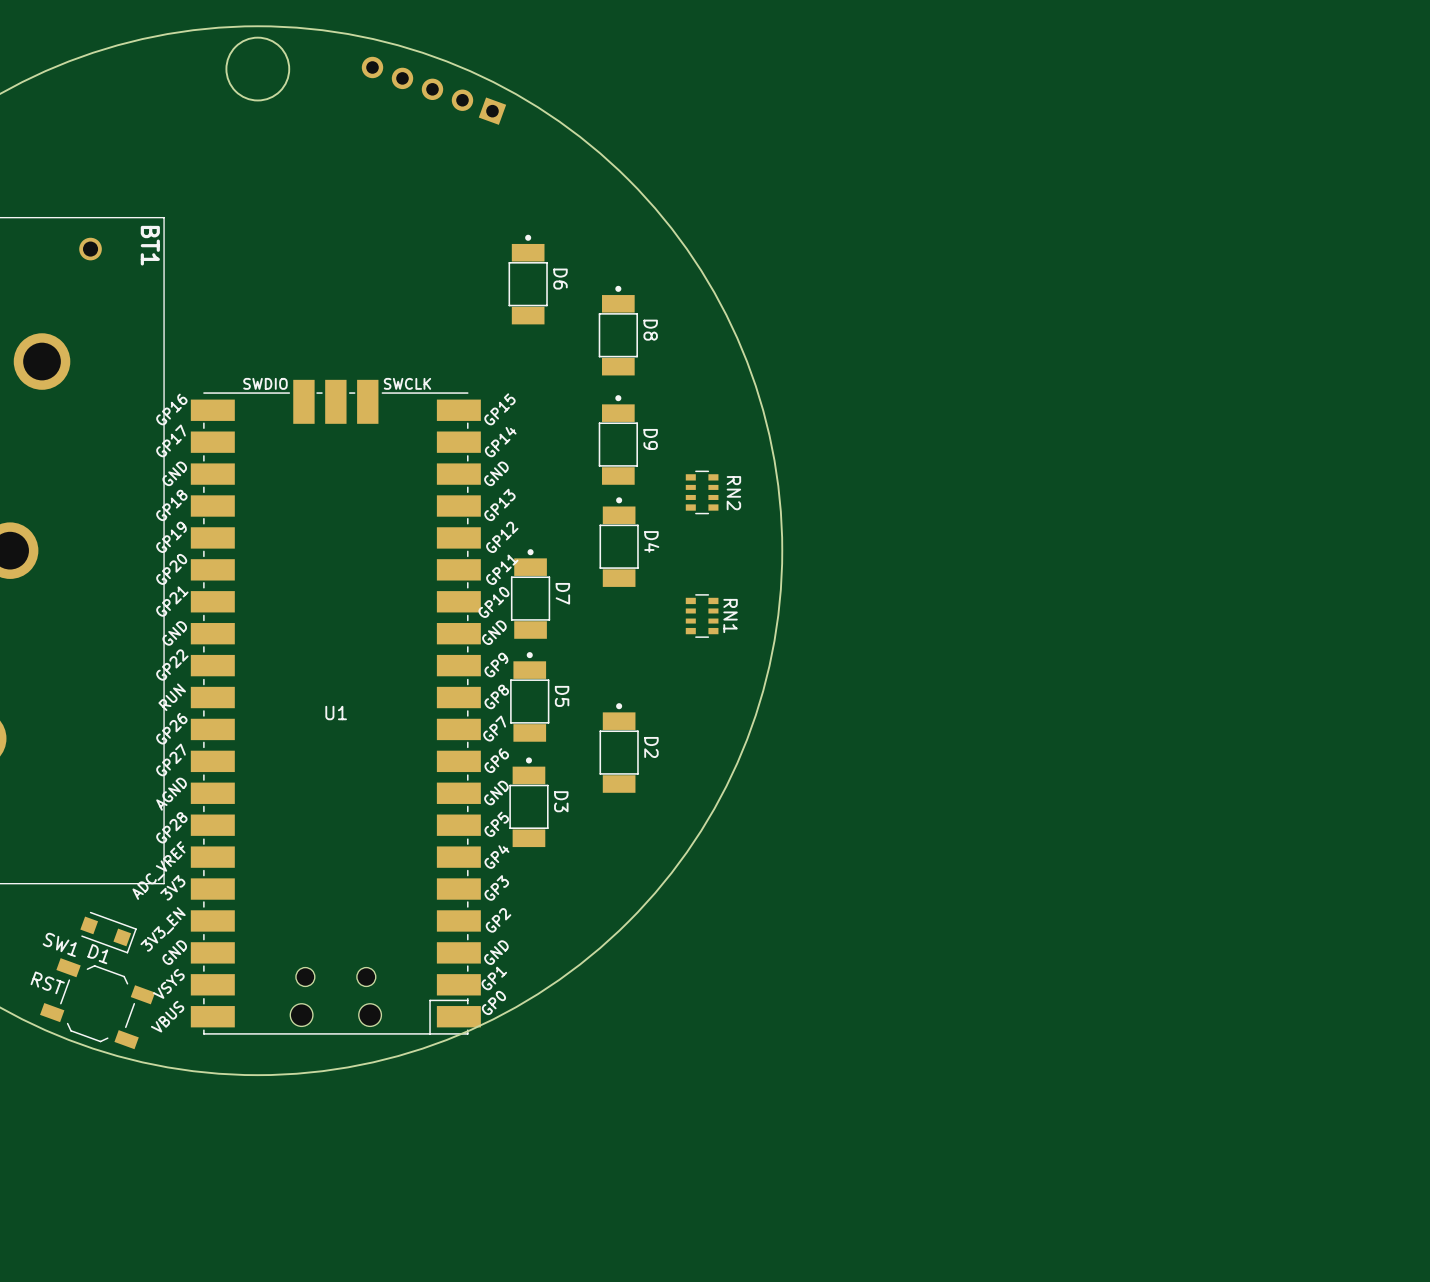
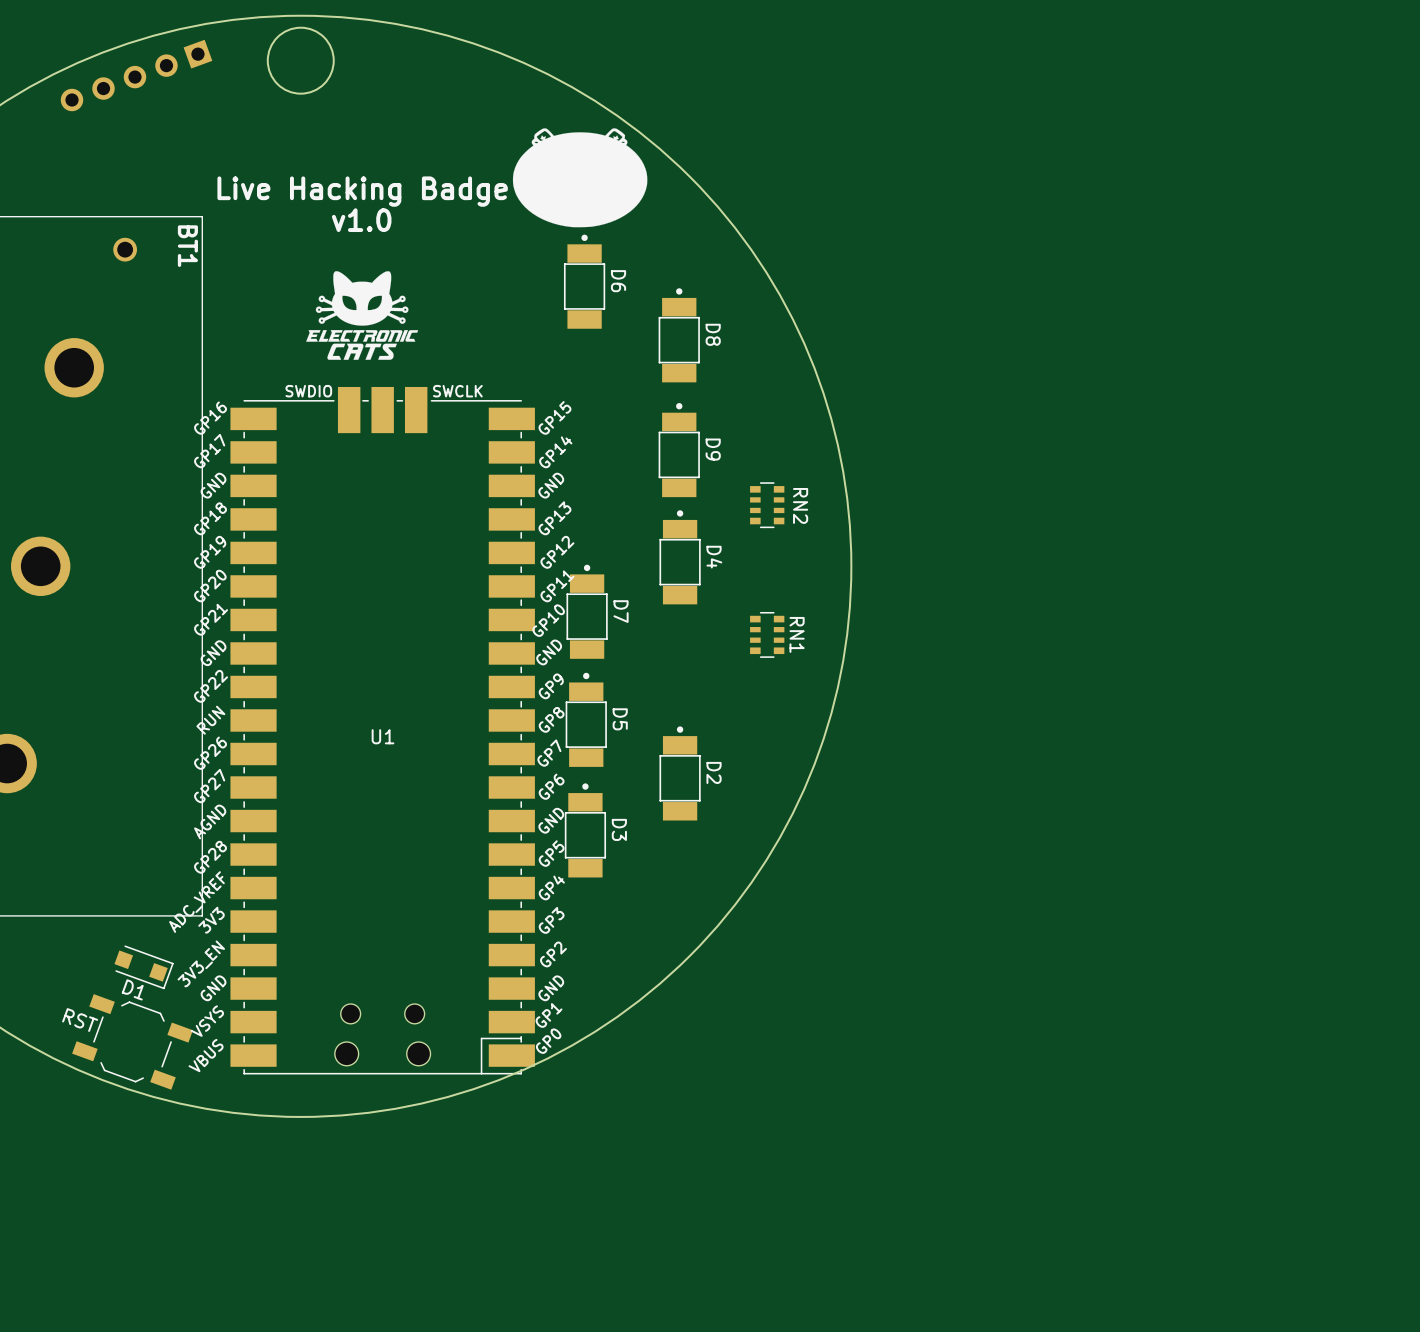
part: none -> (136, 75)
part: (433, 90) -> none
drawing: none -> [512, 128, 648, 228]
text: none -> Live Hacking Badge (362, 191)
text: none -> v1.0 (361, 220)
drawing: none -> [306, 271, 419, 360]
SW1 name: SW1 (59, 944) -> none

